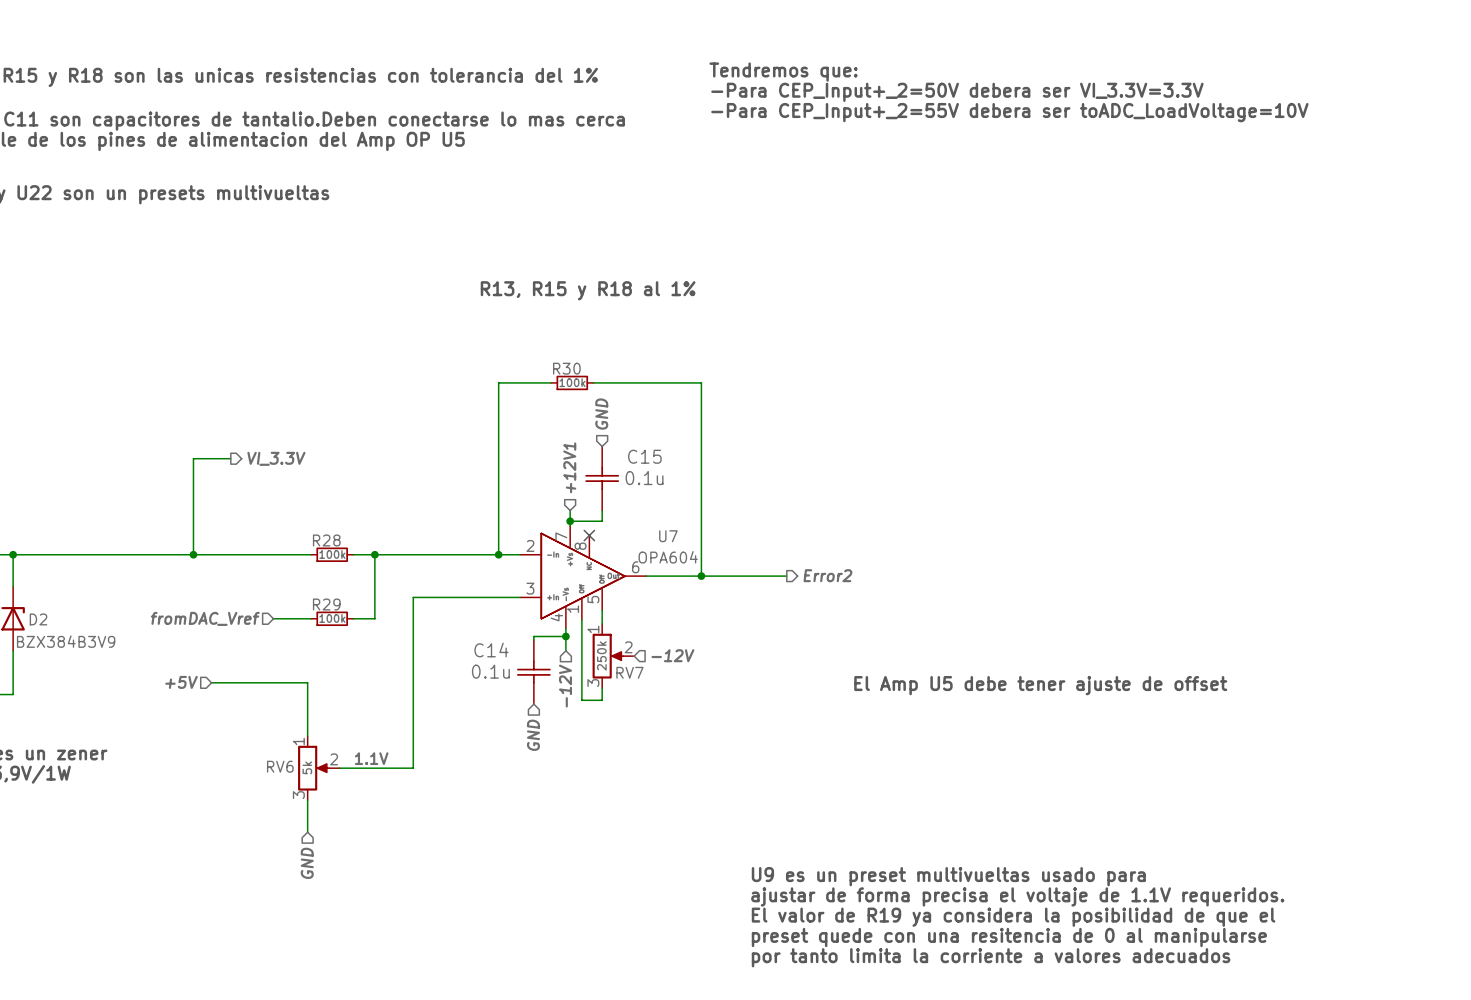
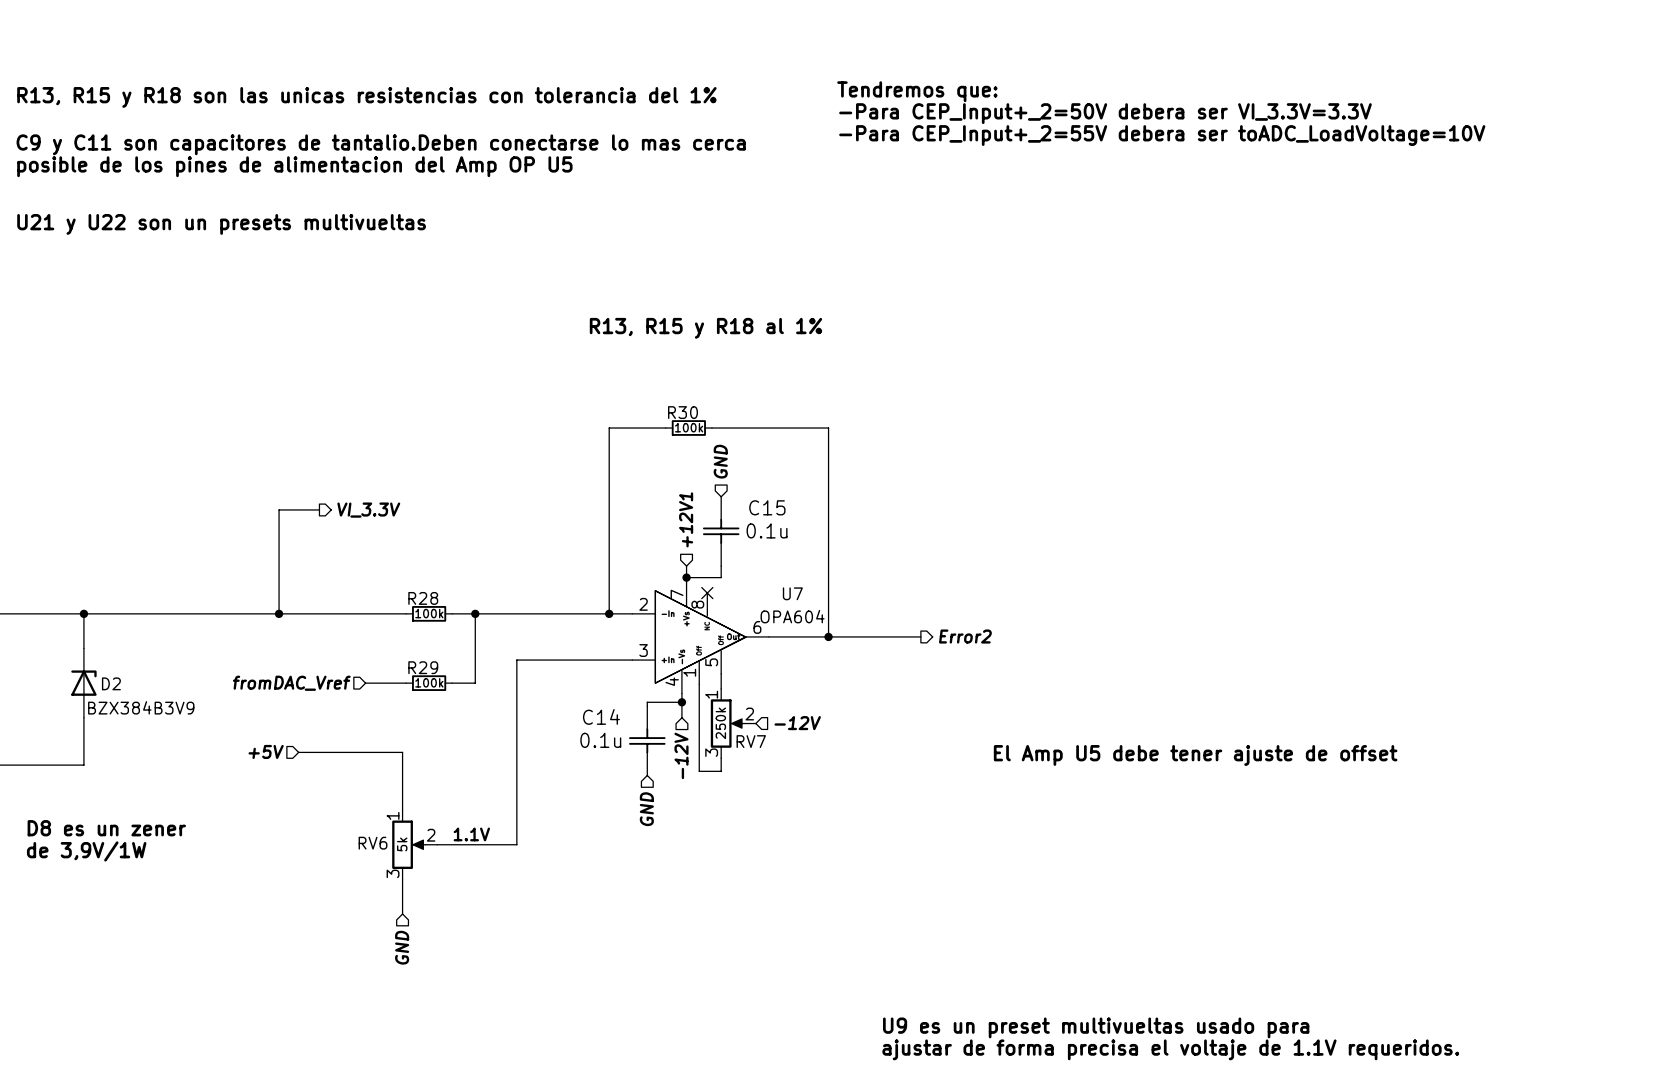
text: U9 es un preset multivueltas usado para (948, 876) -> none
text: ajustar de forma precisa el voltaje de 1.1V requeridos. (1017, 896) -> none
text: El valor de R19 ya considera la posibilidad de que el (1013, 917) -> none
text: preset quede con una resitencia de 0 al manipularse (1009, 937) -> U9 es un preset multivueltas usado para (1096, 1027)
text: por tanto limita la corriente a valores adecuados (991, 957) -> ajustar de forma precisa el voltaje de 1.1V requeridos. (1170, 1049)

